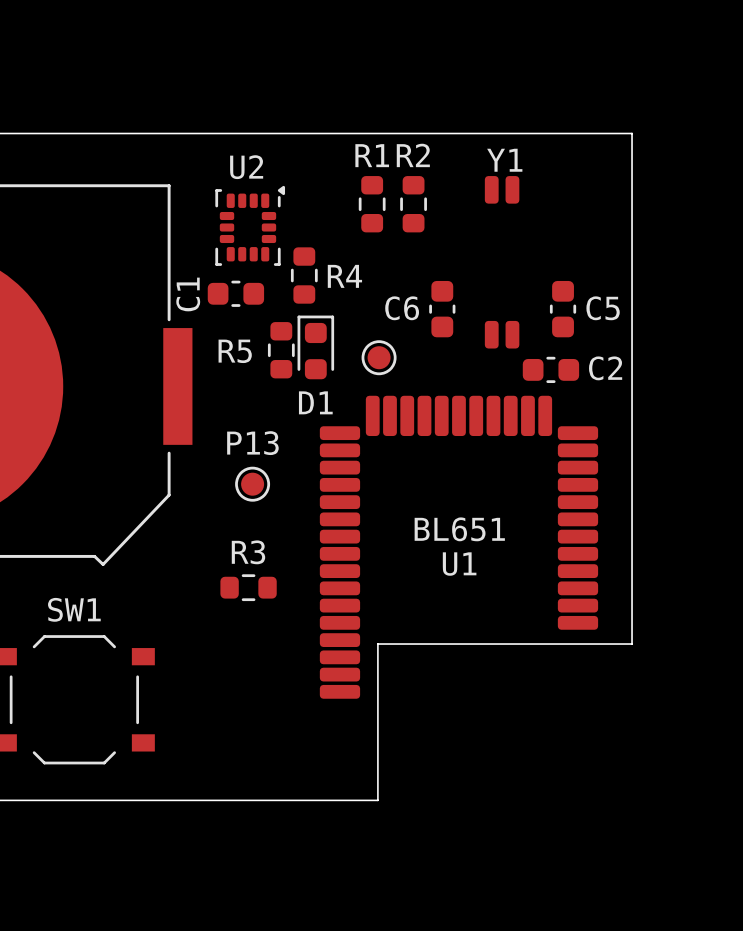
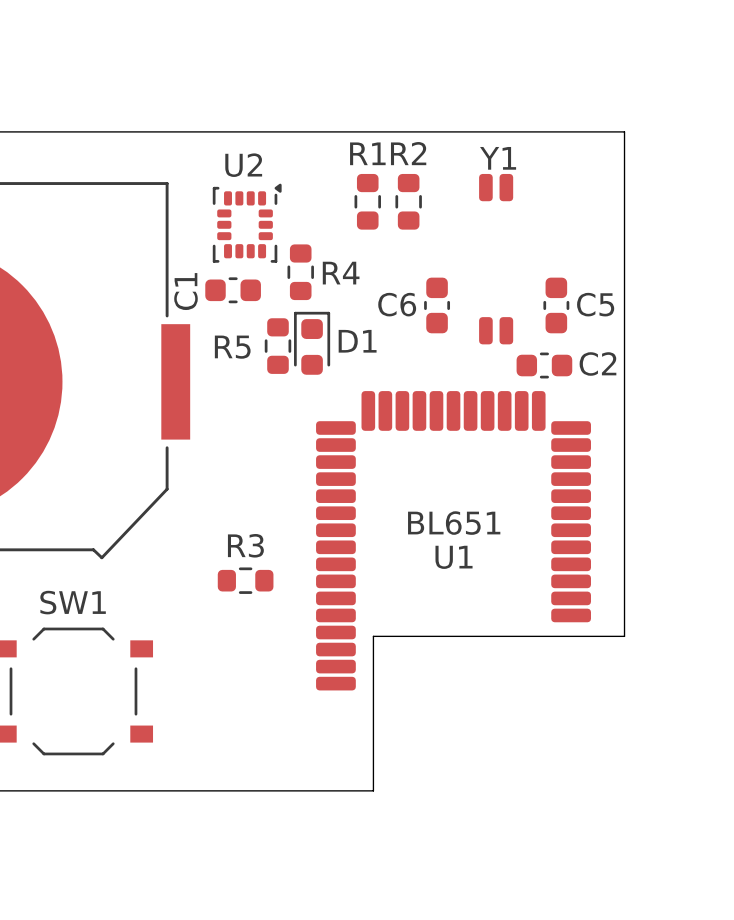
part: (379, 357) -> none
D1 name position: D1 (315, 402) -> D1 (357, 341)
P13: (252, 484) -> none

